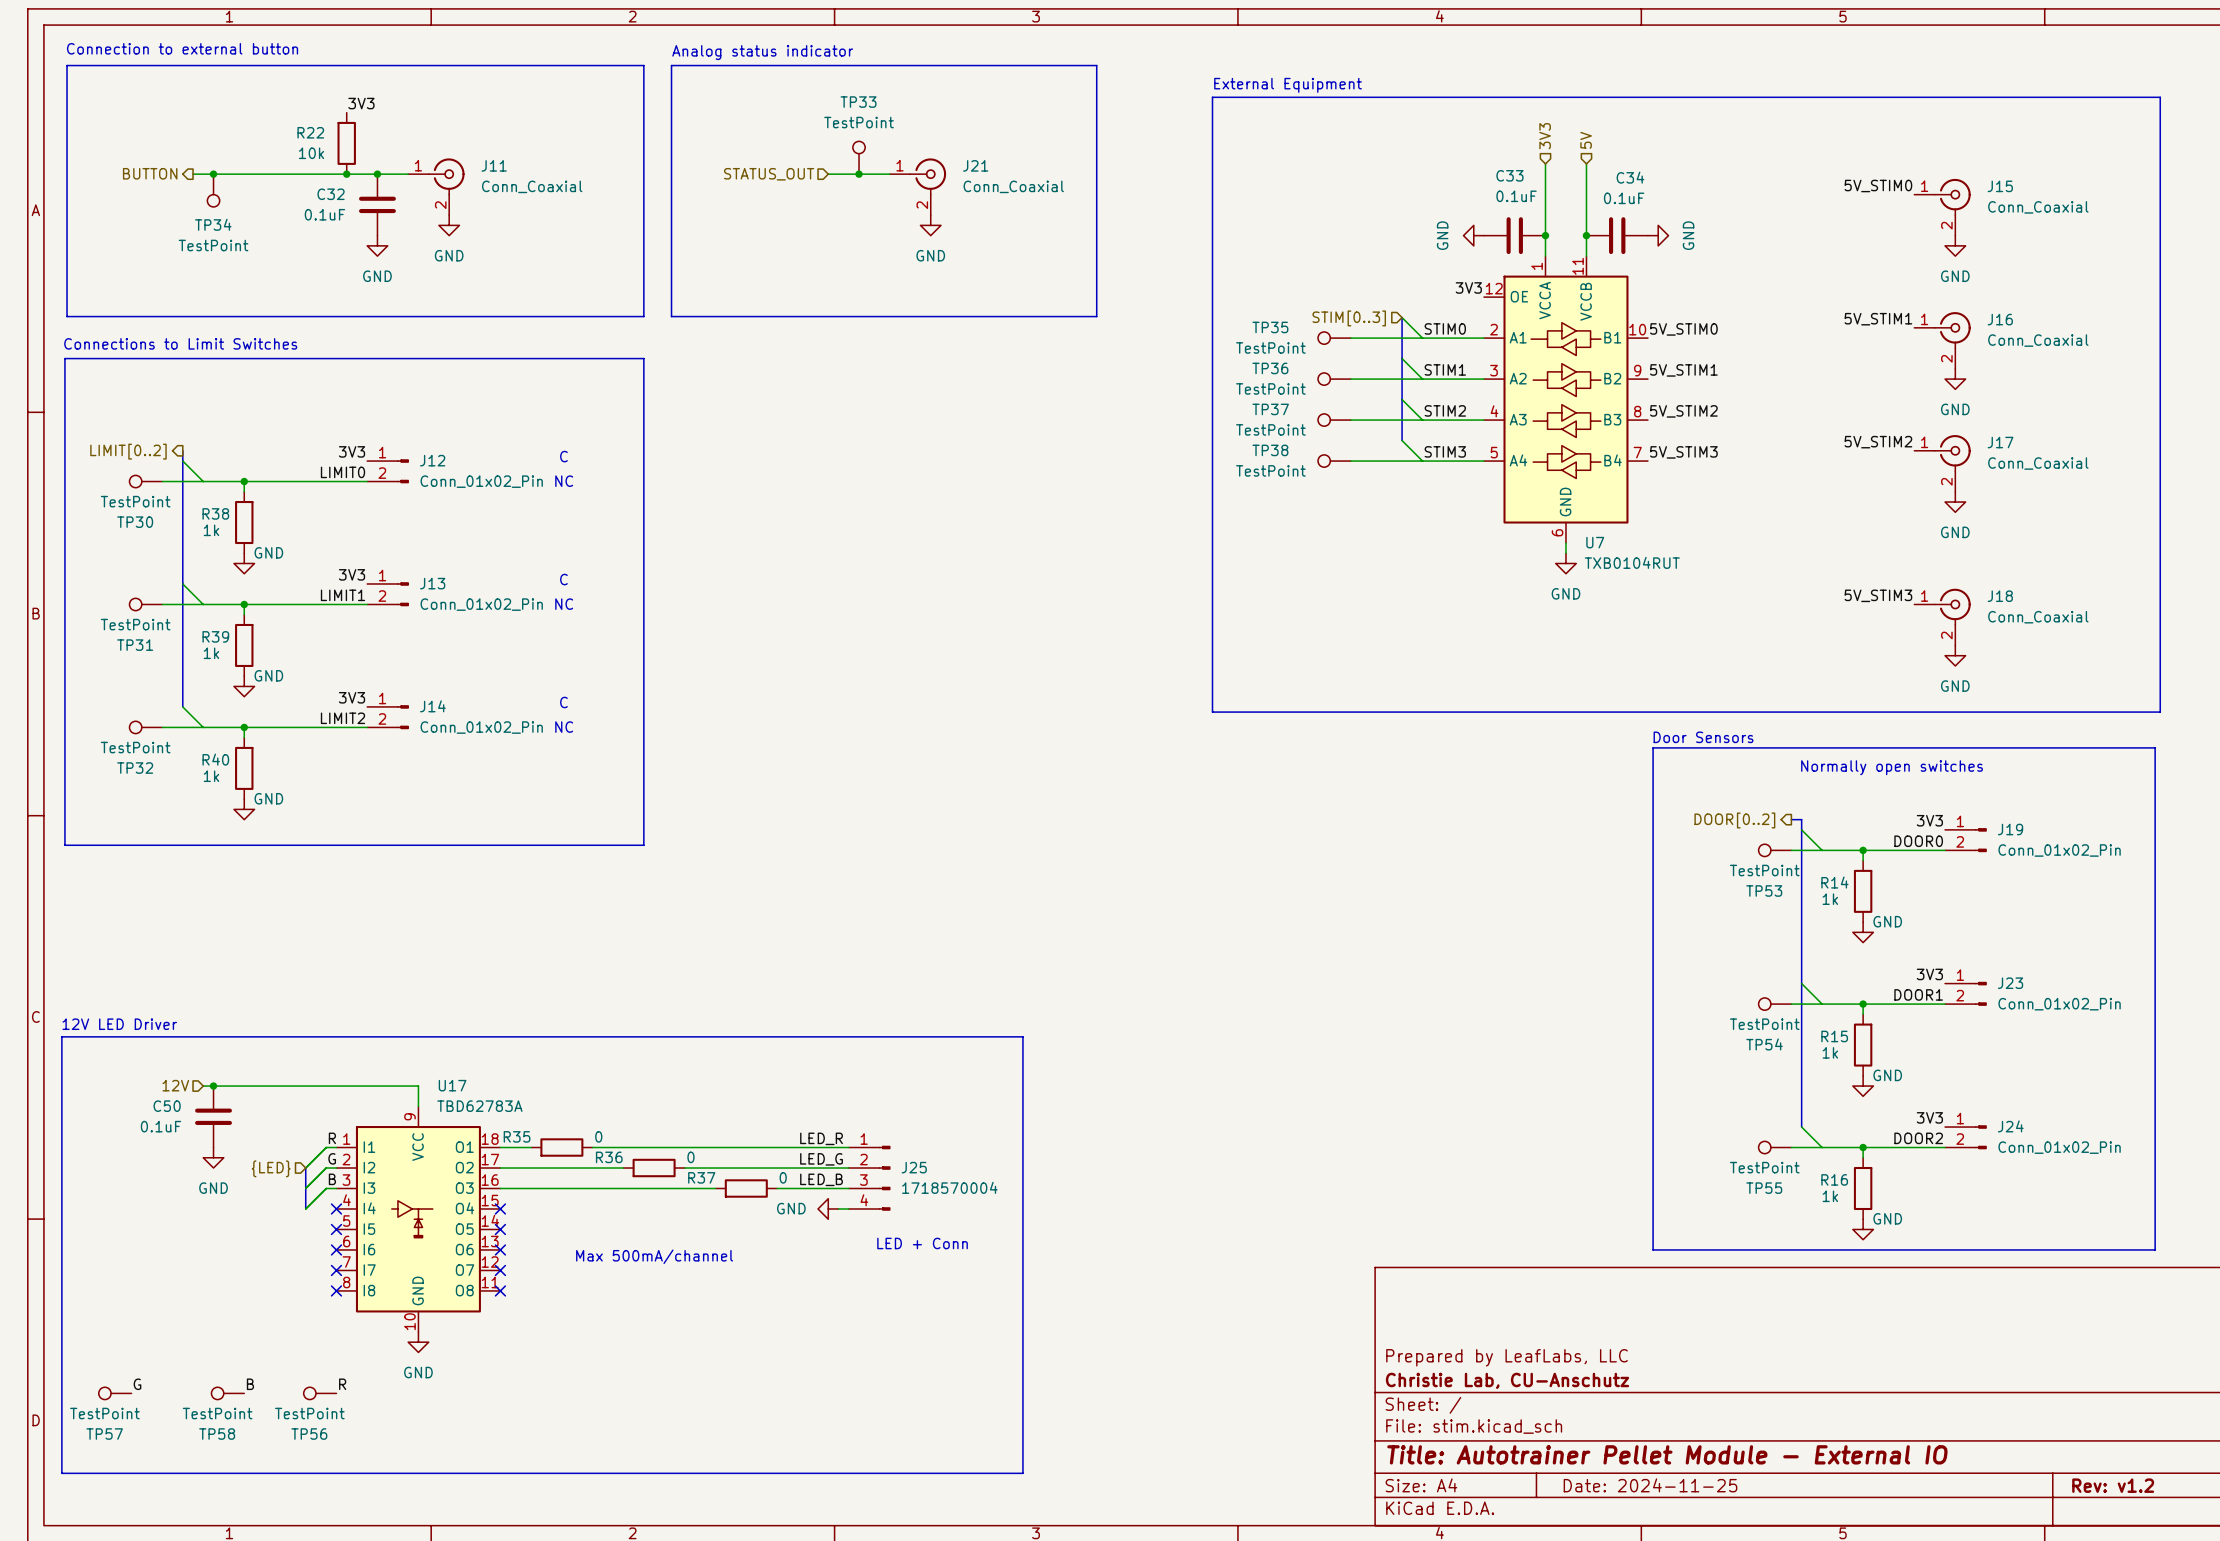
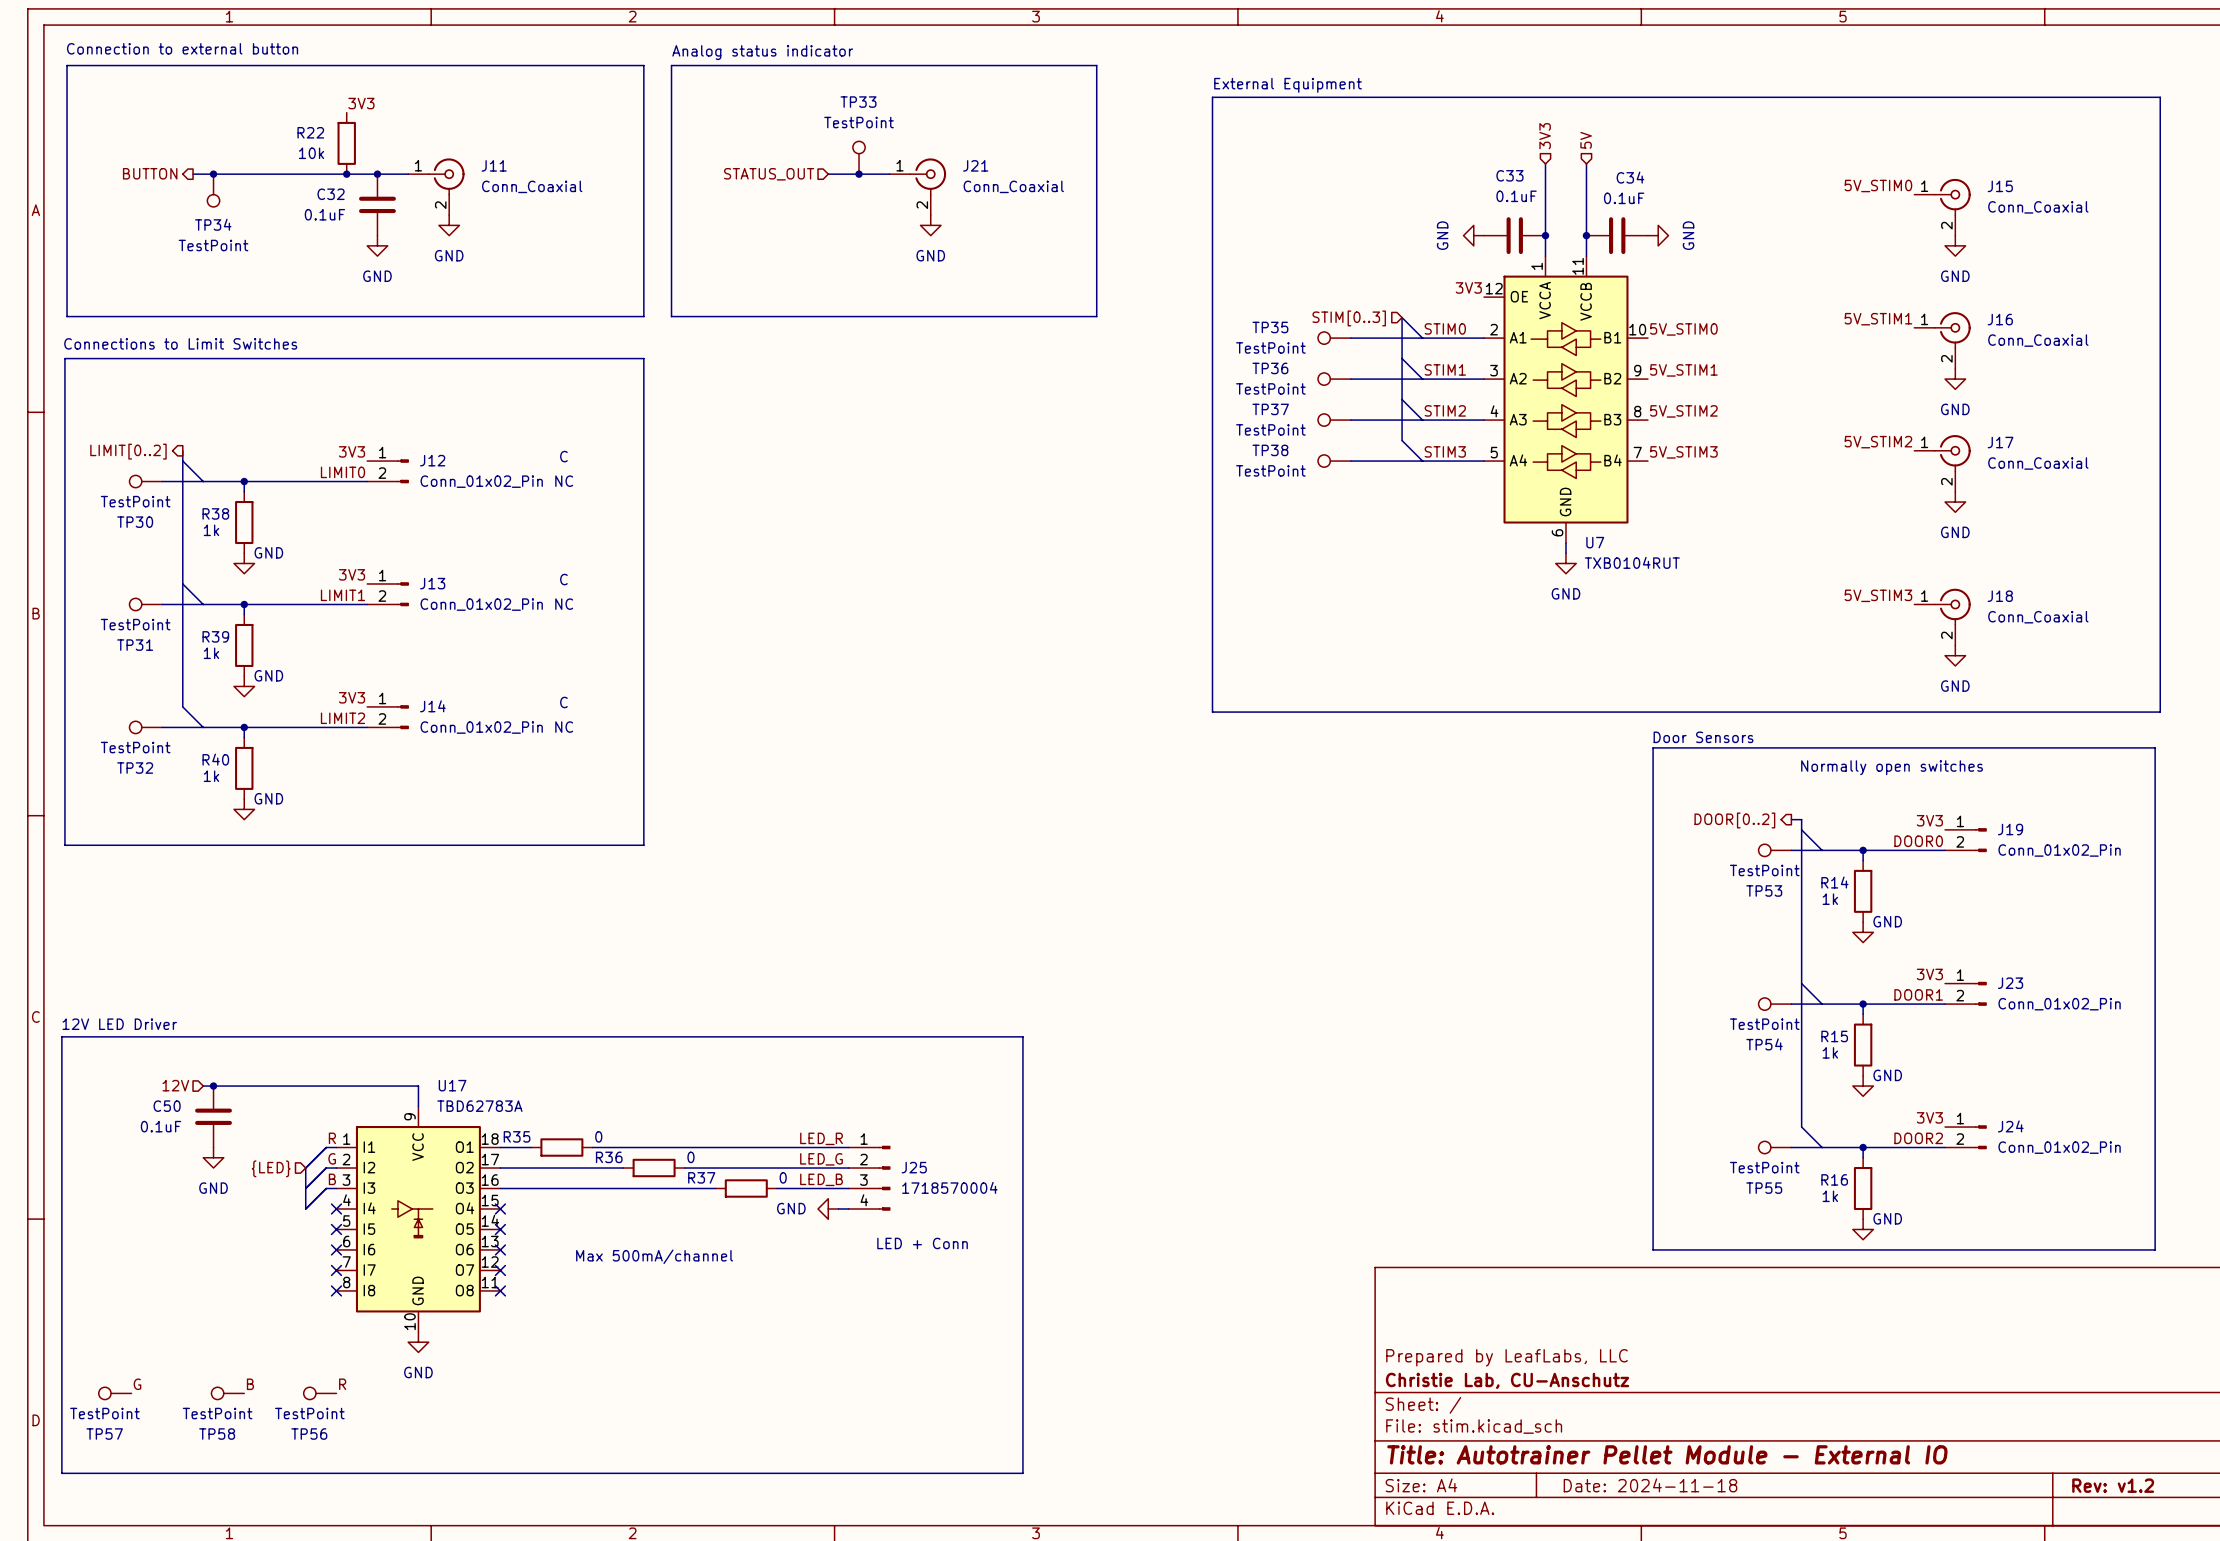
title block: Date: 2024-11-25 (1650, 1485) -> Date: 2024-11-18 (1650, 1485)

